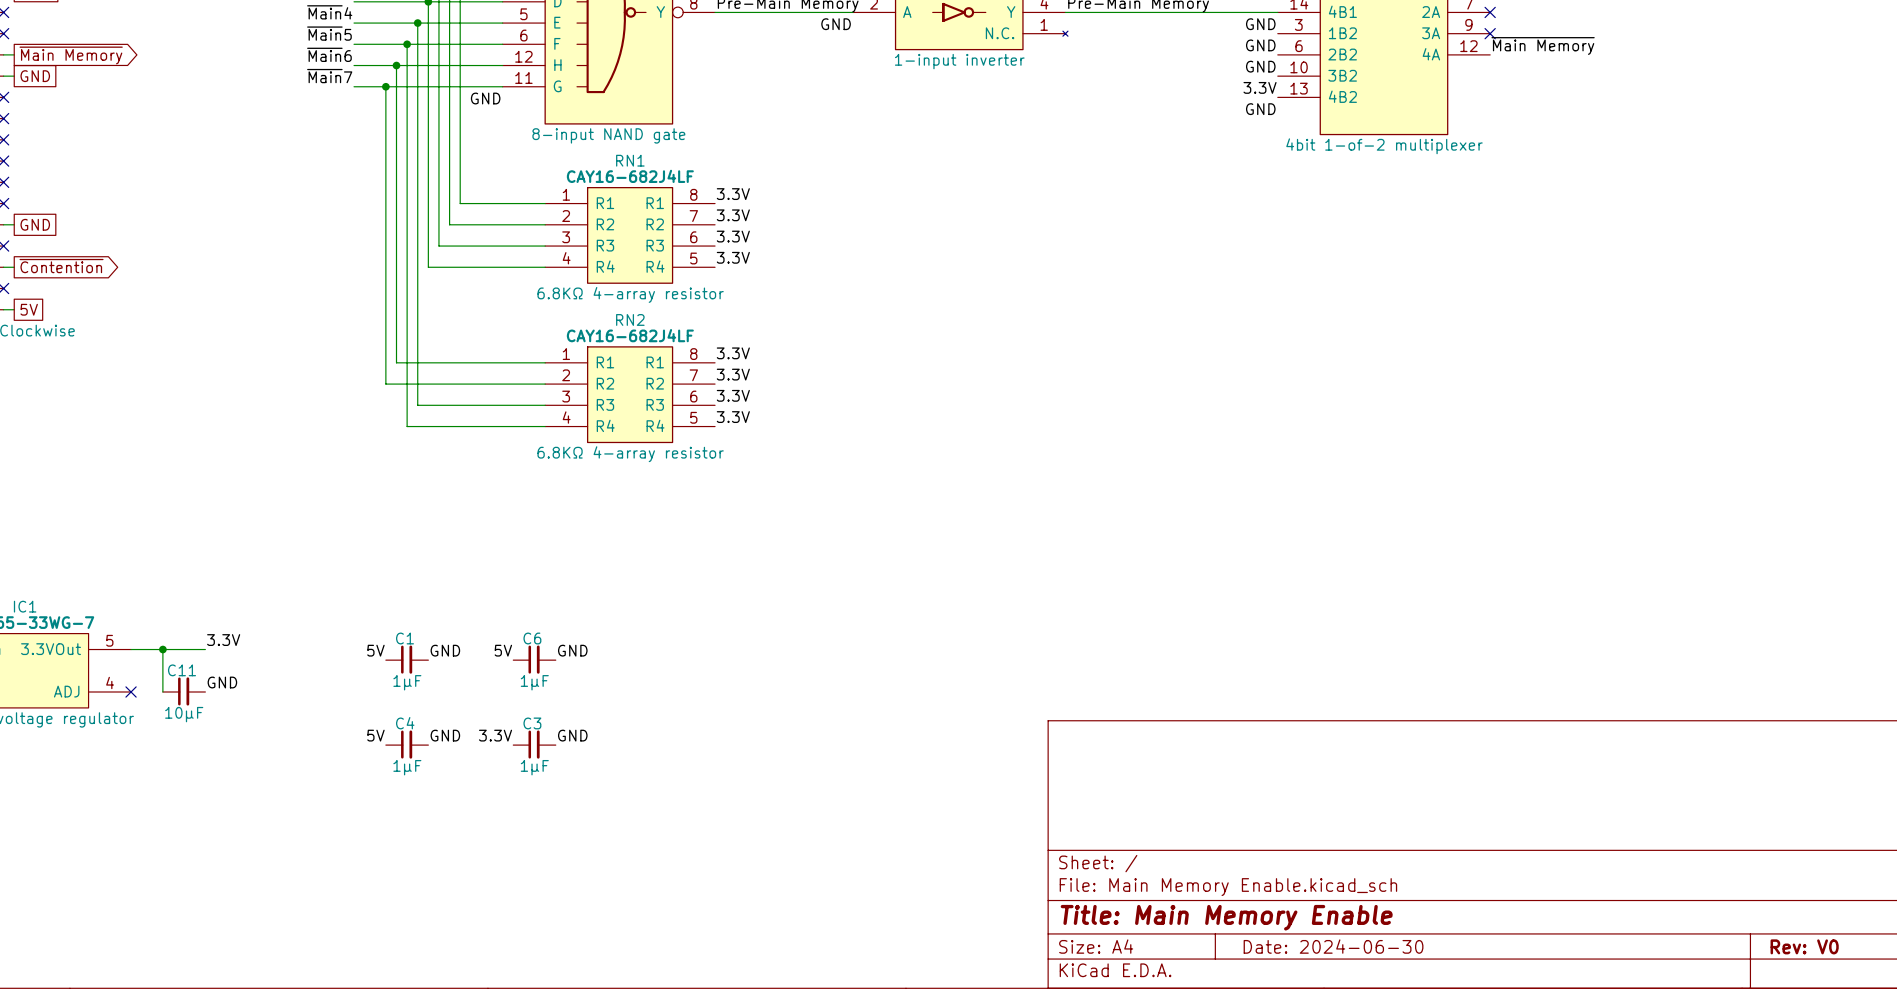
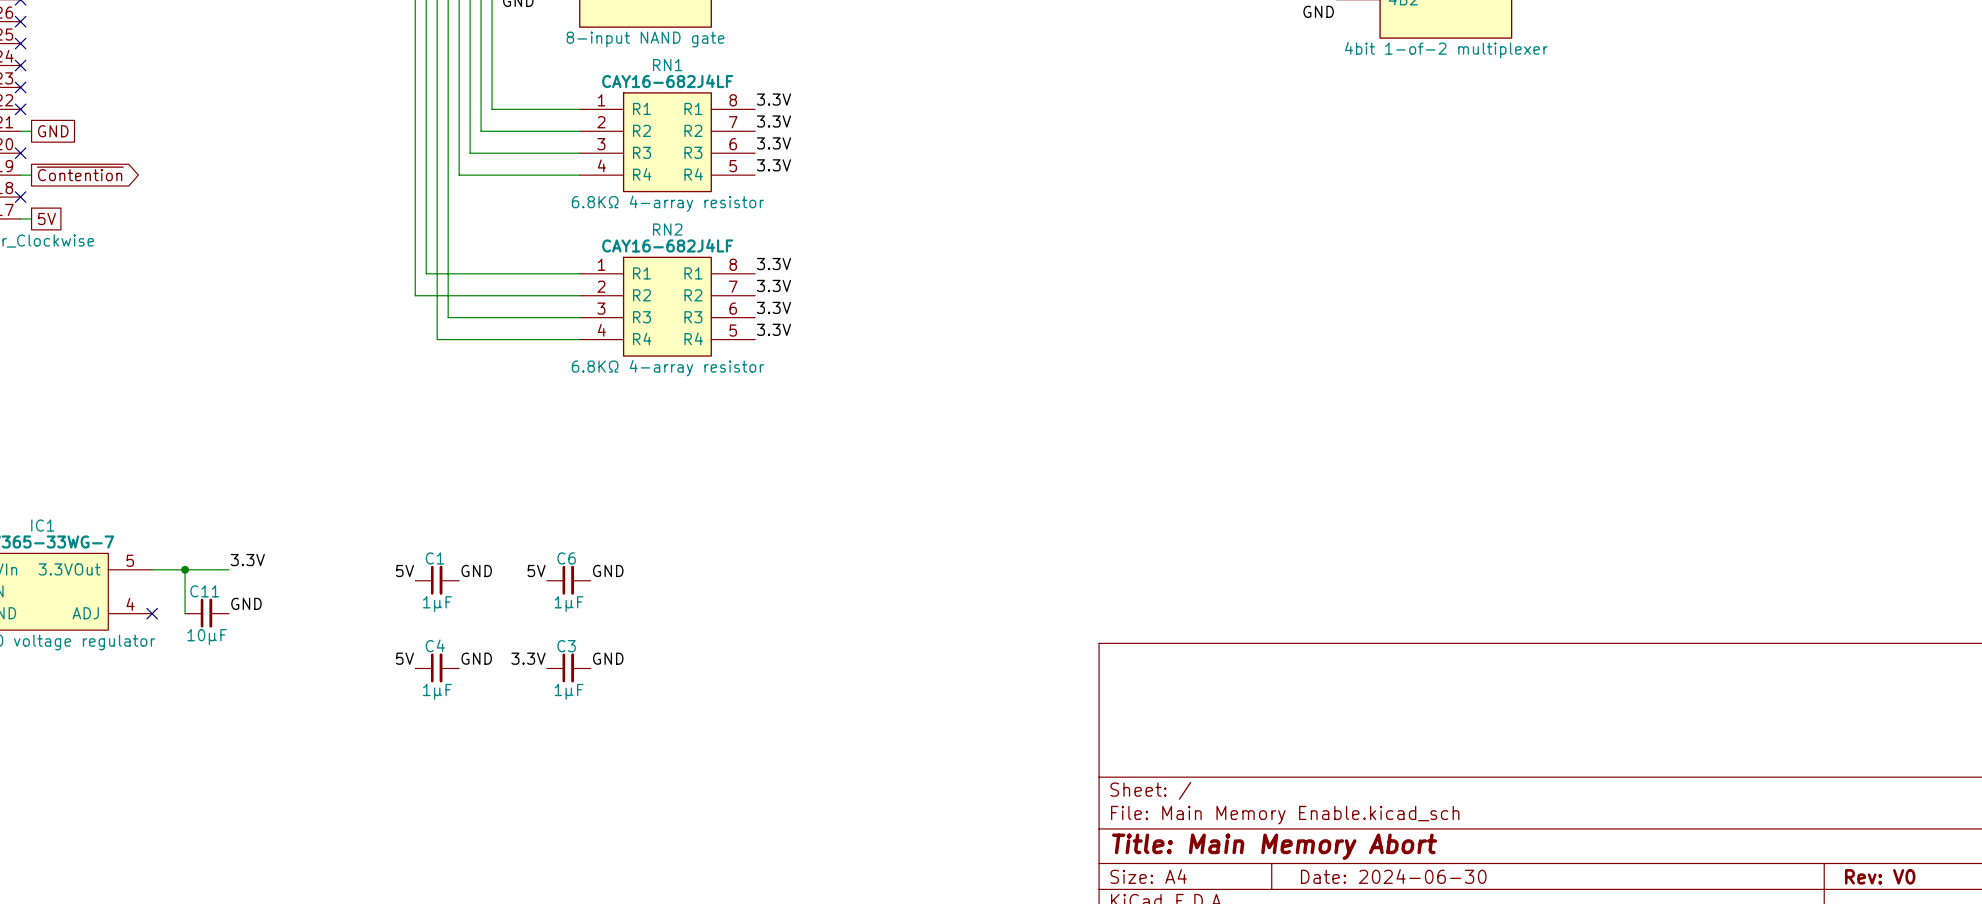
title block: Title: Main Memory Enable (1226, 917) -> Title: Main Memory Abort (1274, 846)

